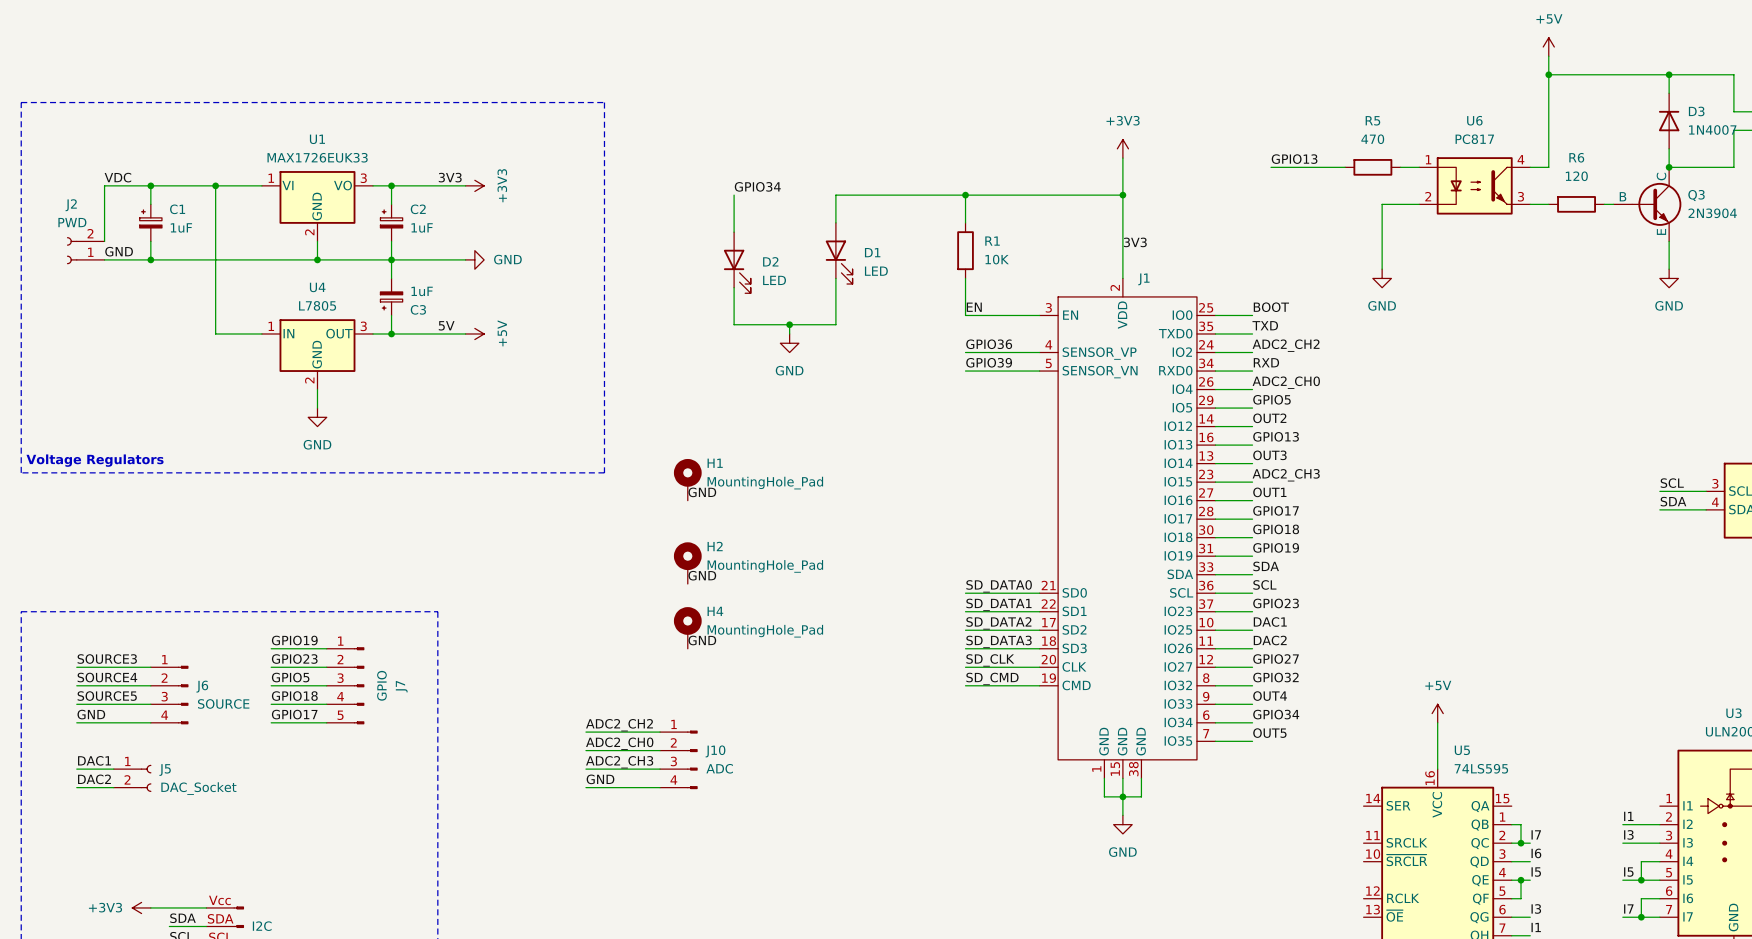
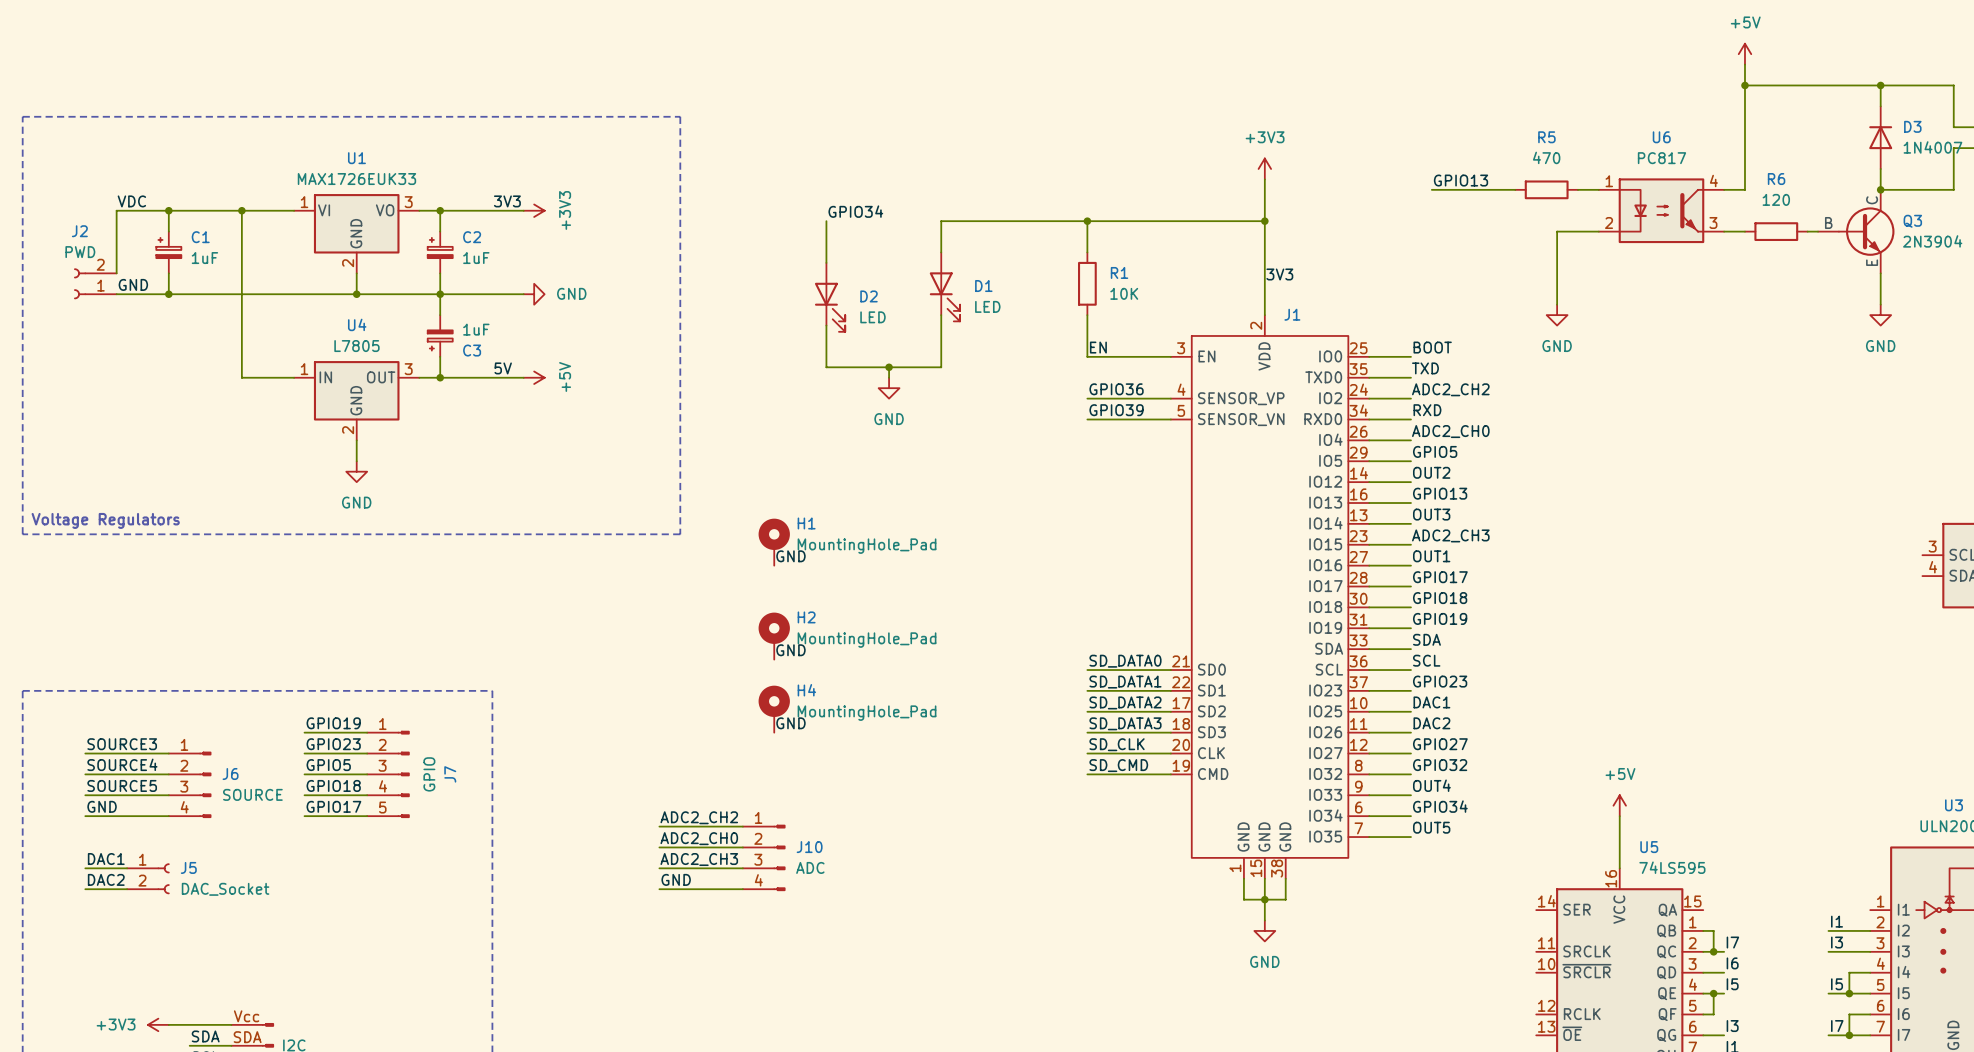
label: SCL (1672, 483) -> none
wire: (1659, 491) (1706, 491) -> none
label: SDA (1673, 501) -> none
wire: (1659, 509) (1706, 509) -> none

